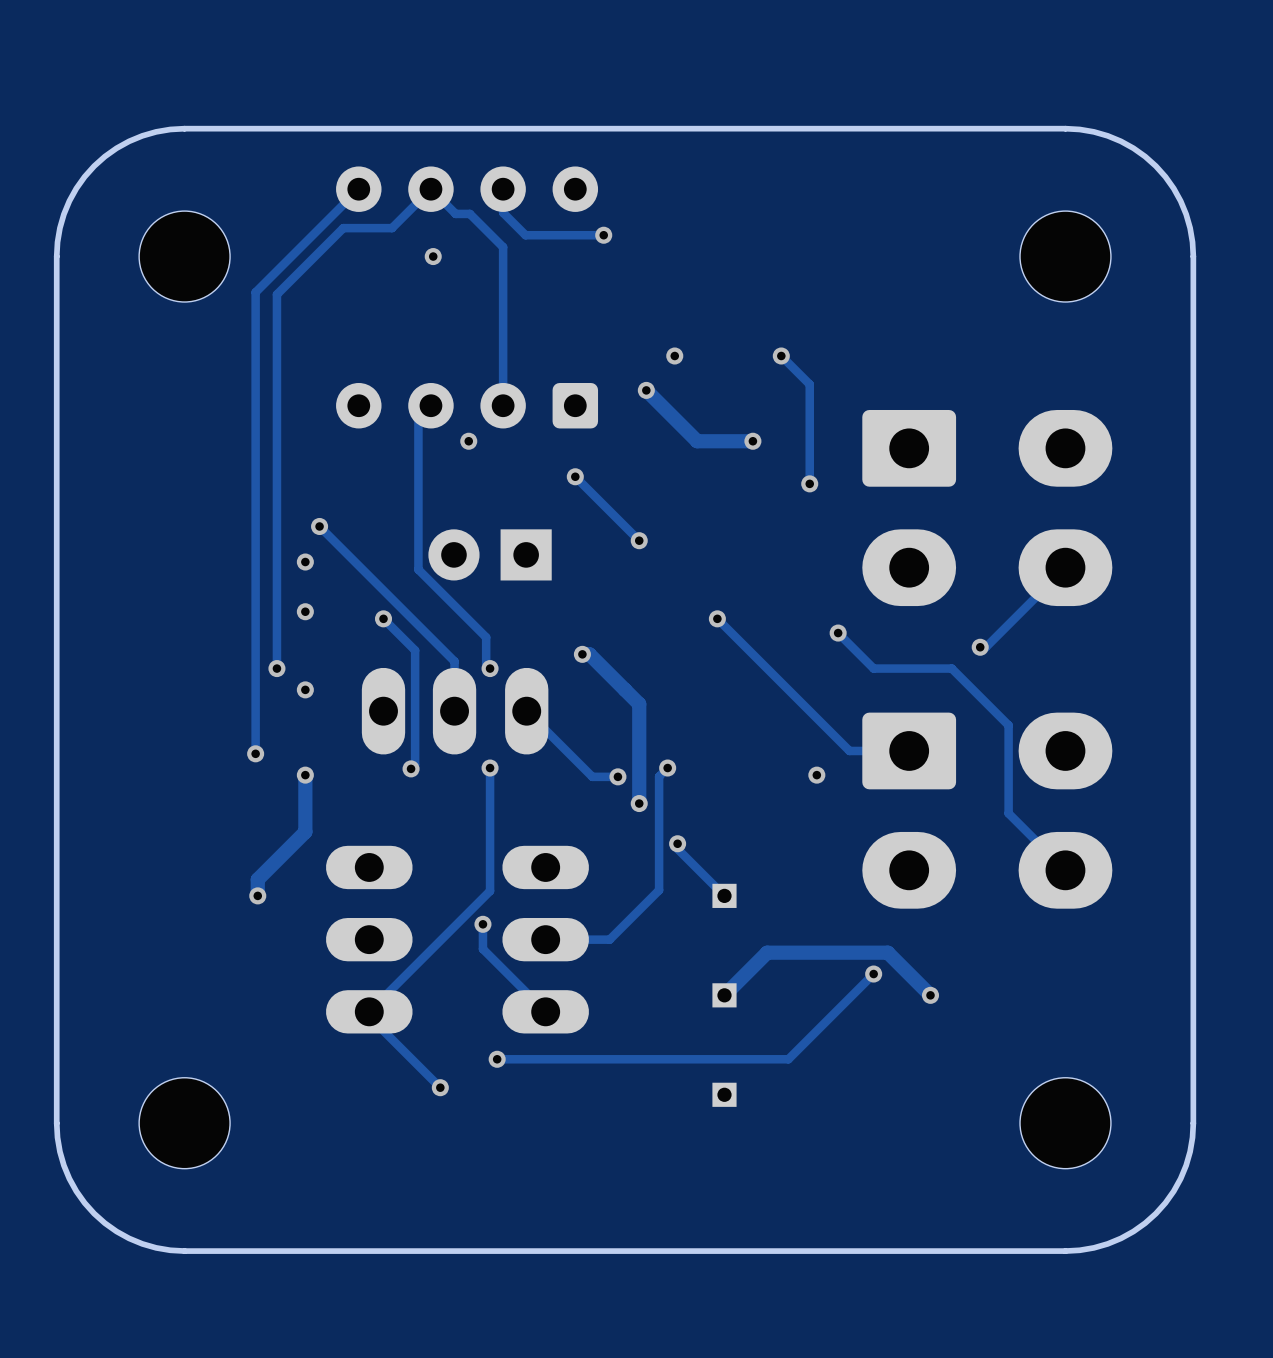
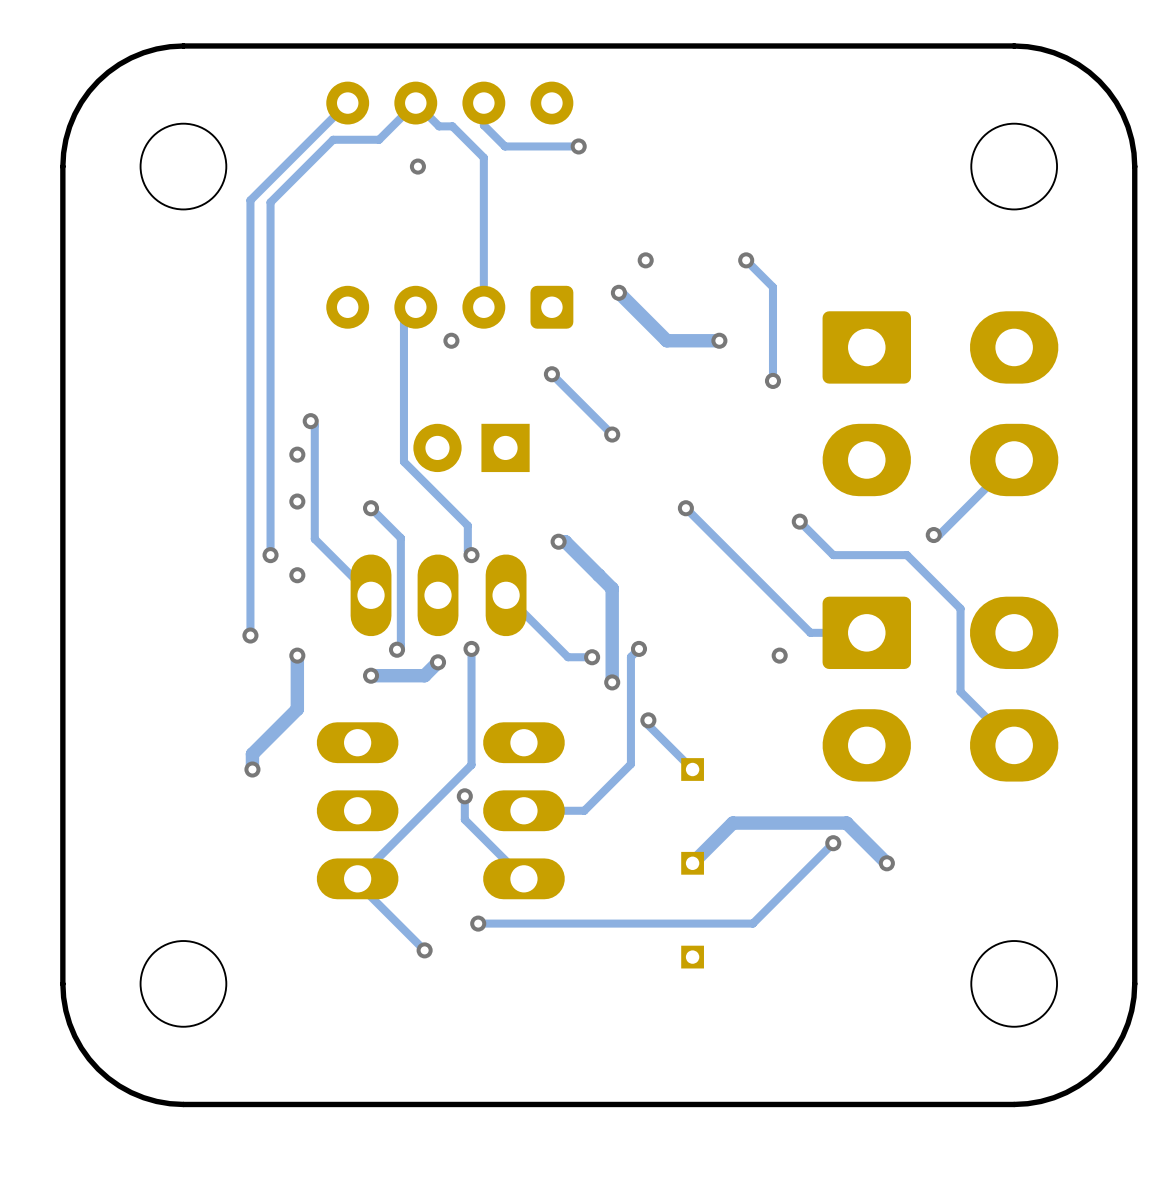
track: (323, 530) (454, 661) (454, 711) -> (314, 425) (314, 539) (371, 595)
track: none -> (438, 662) (424, 675) (371, 675)
via: none -> (438, 662)
via: none -> (371, 675)

